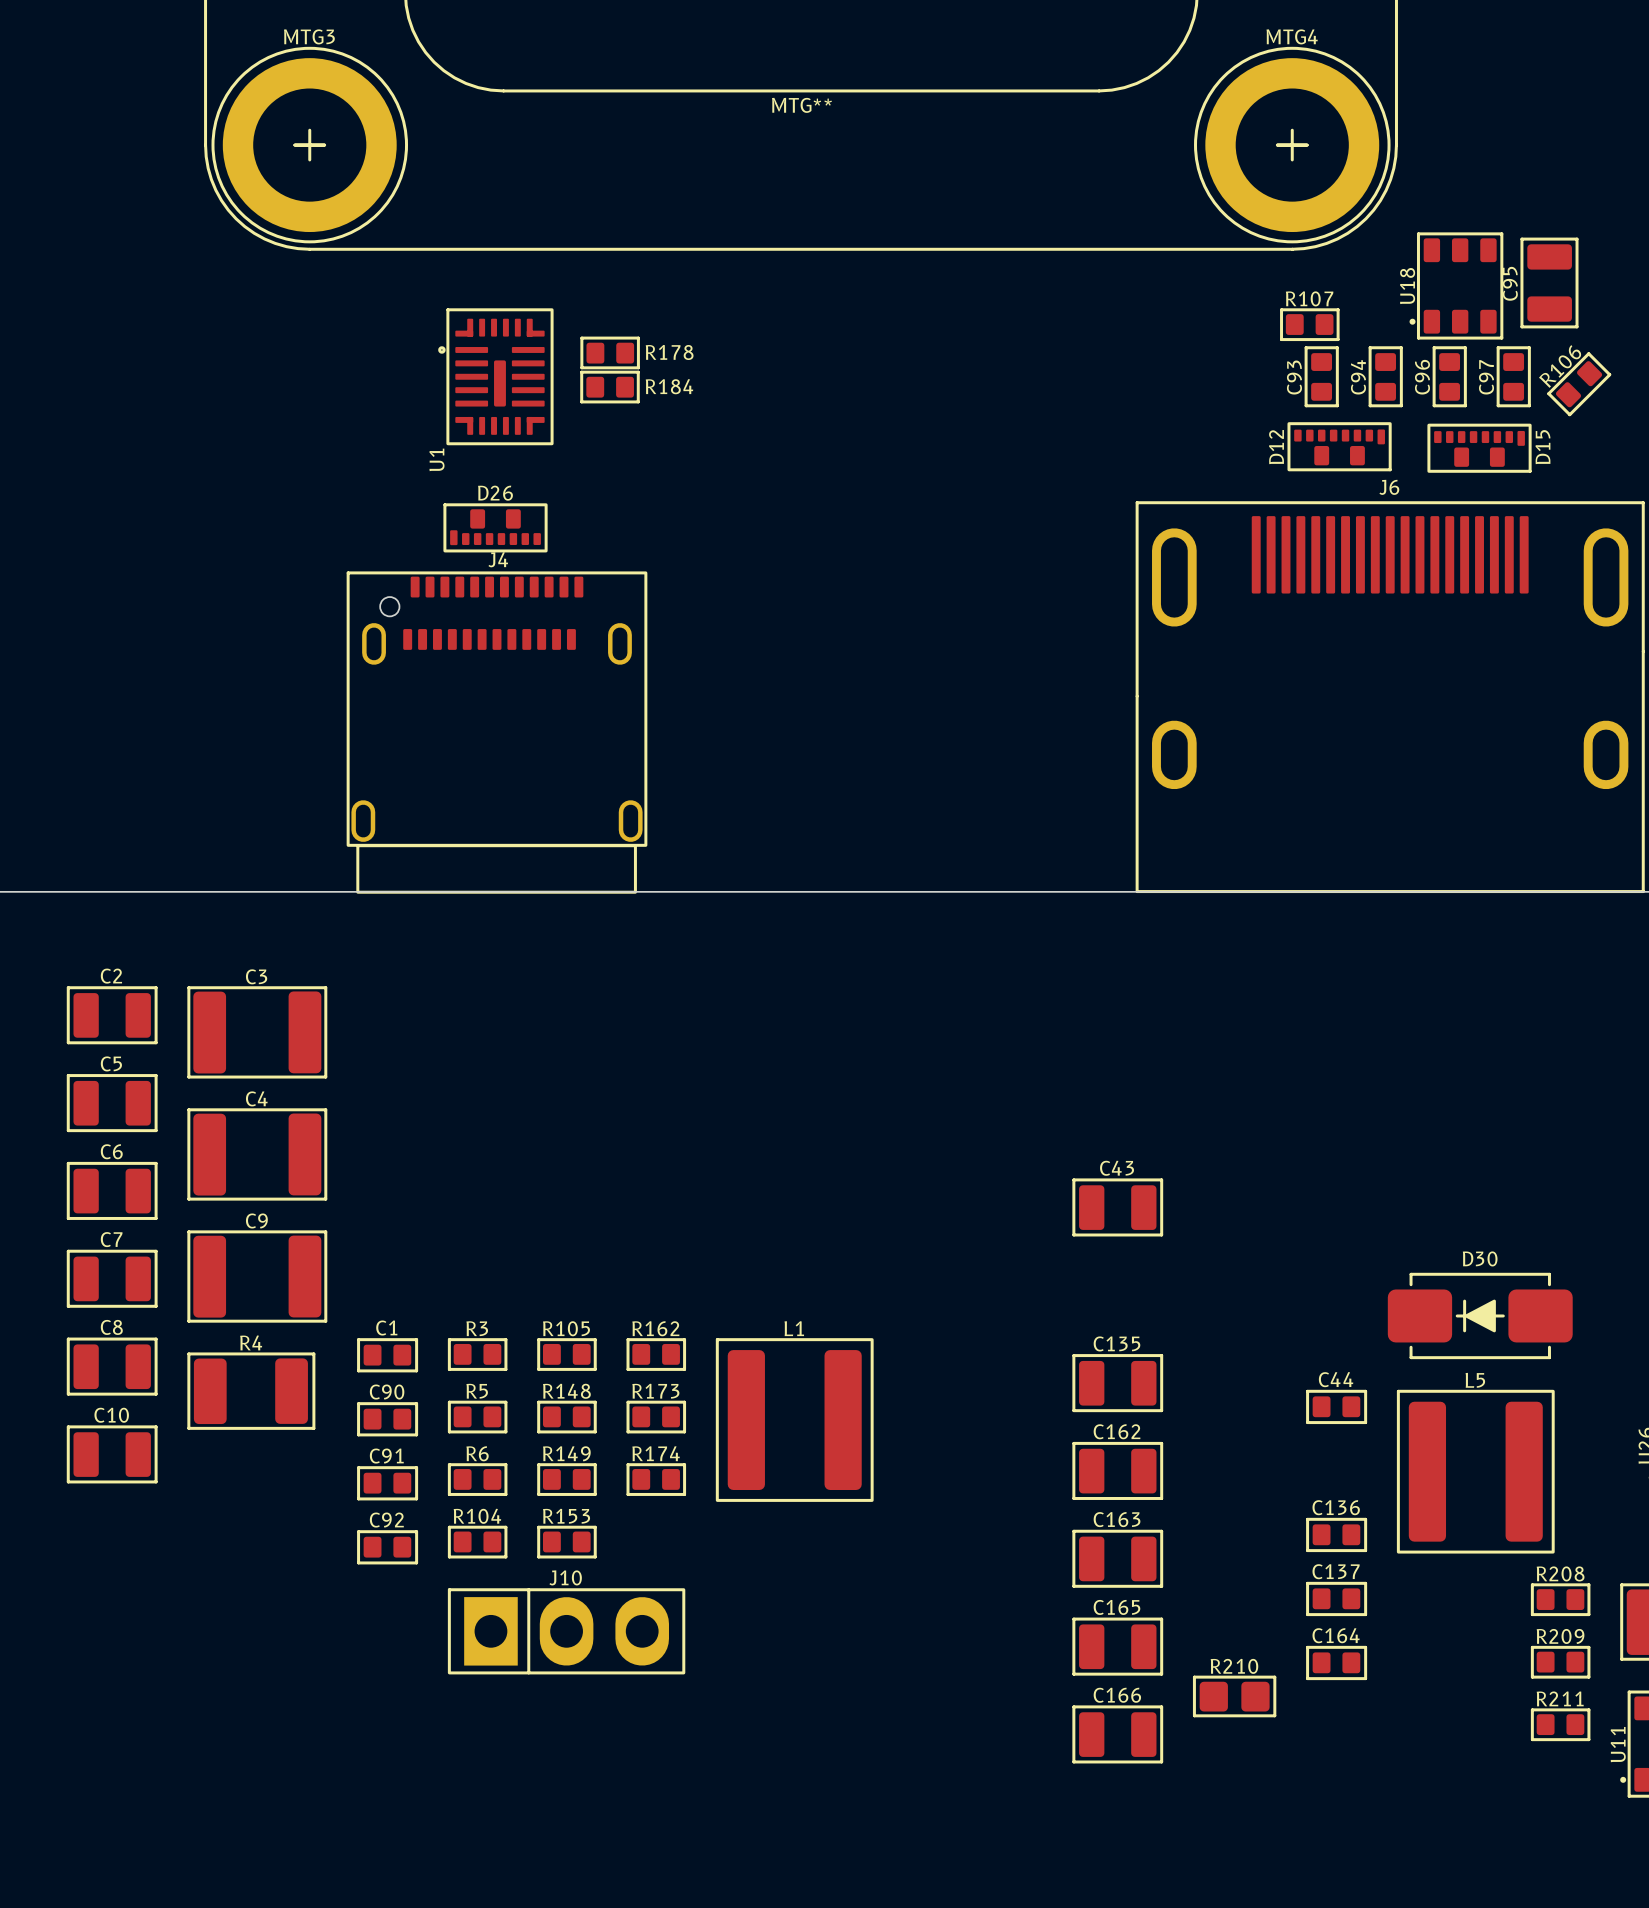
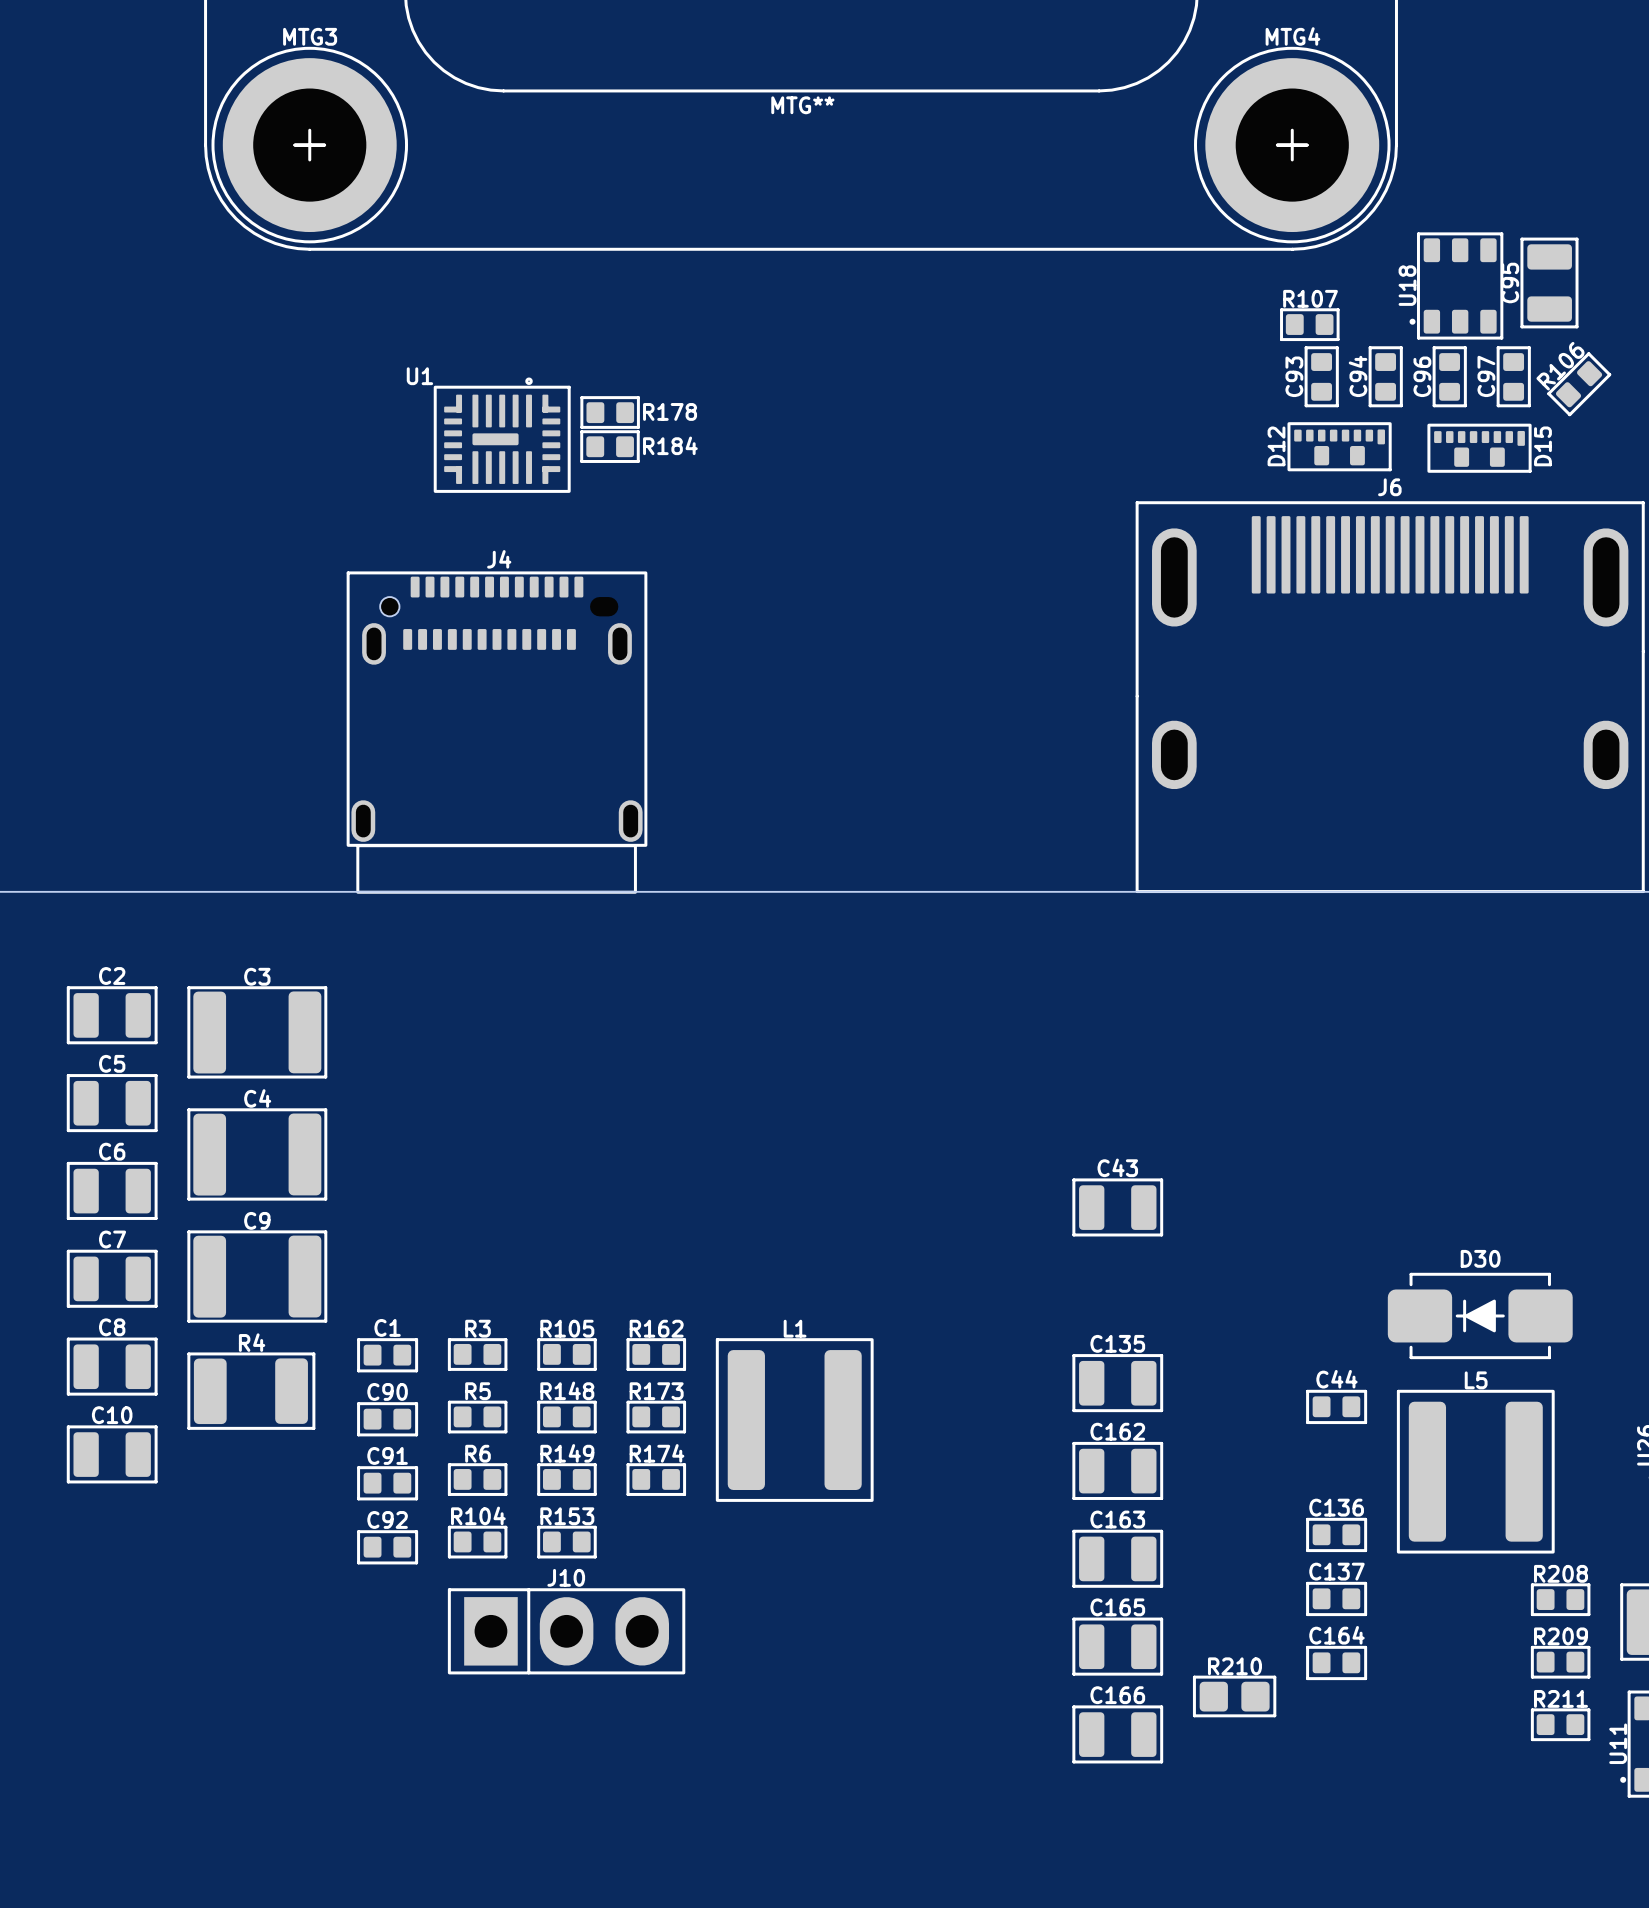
R178 position: (610, 352) -> (610, 412)
U1 rotation: 0° (495, 376) -> 90° clockwise (502, 435)
R184 position: (609, 387) -> (609, 446)
D26: (495, 527) -> none

